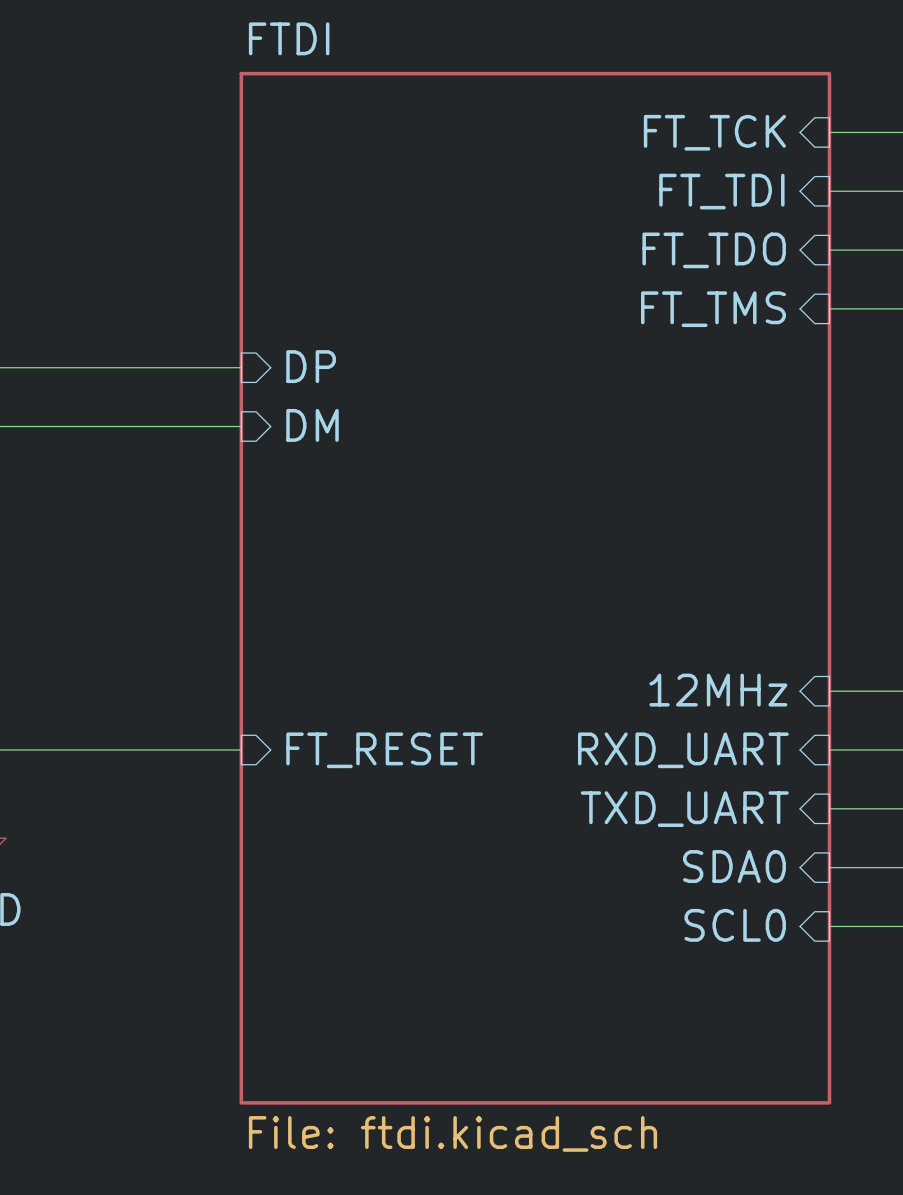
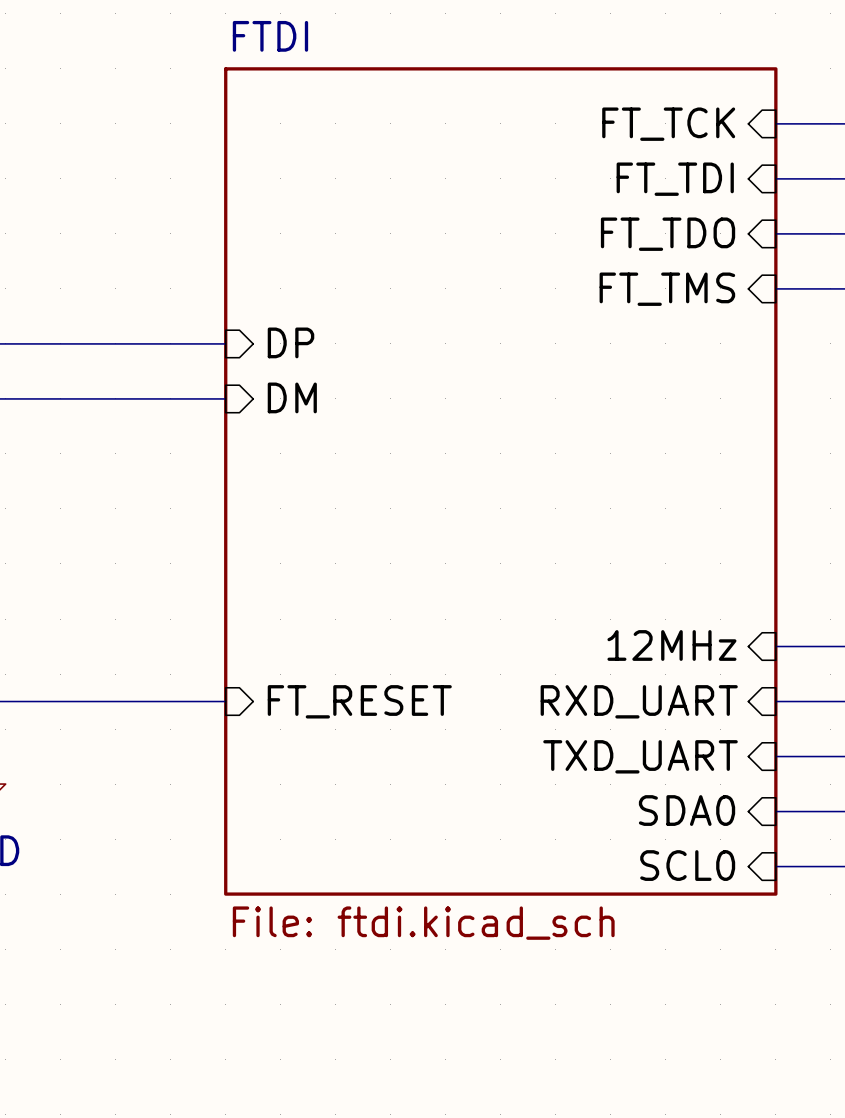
sheet FTDI: none -> File: ftdi.kicad_sch (500, 481)
sheet FTDI: File: ftdi.kicad_sch (535, 588) -> none

